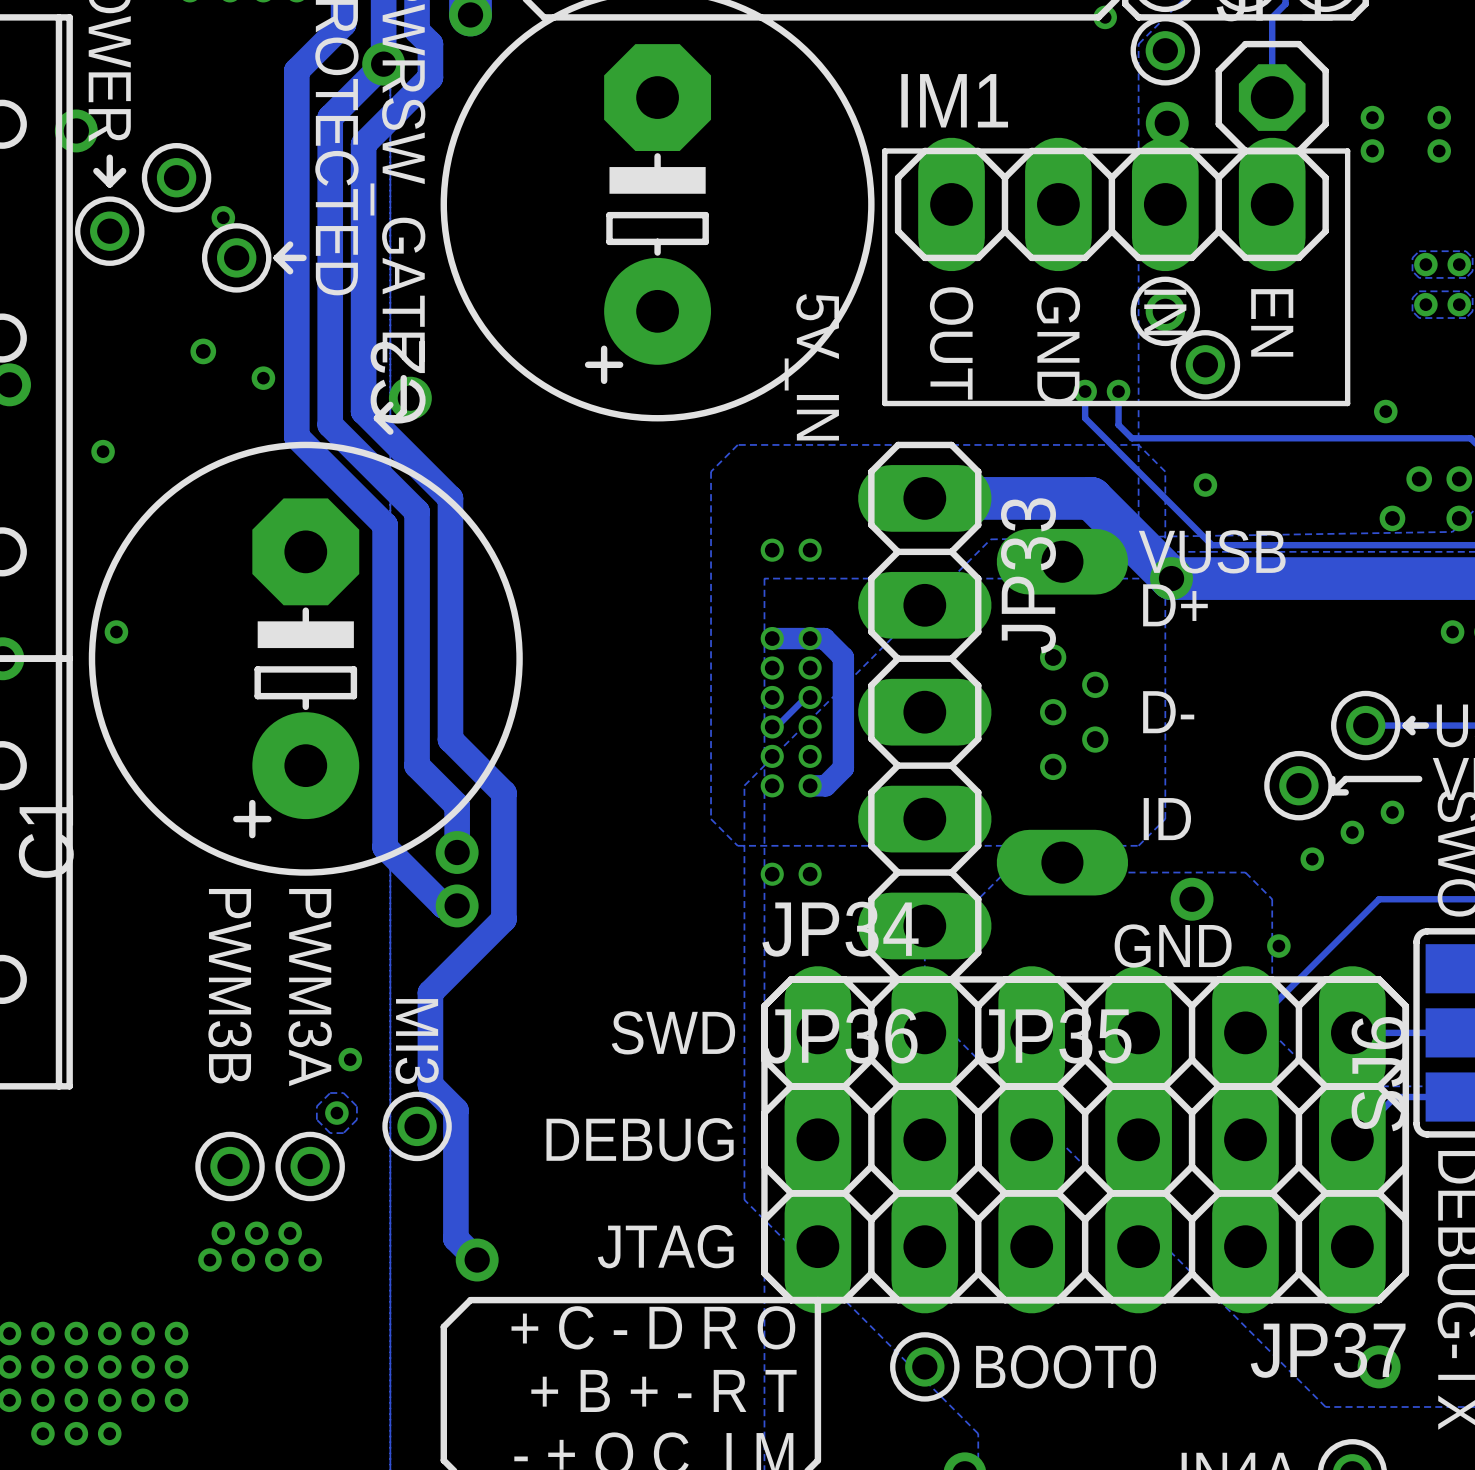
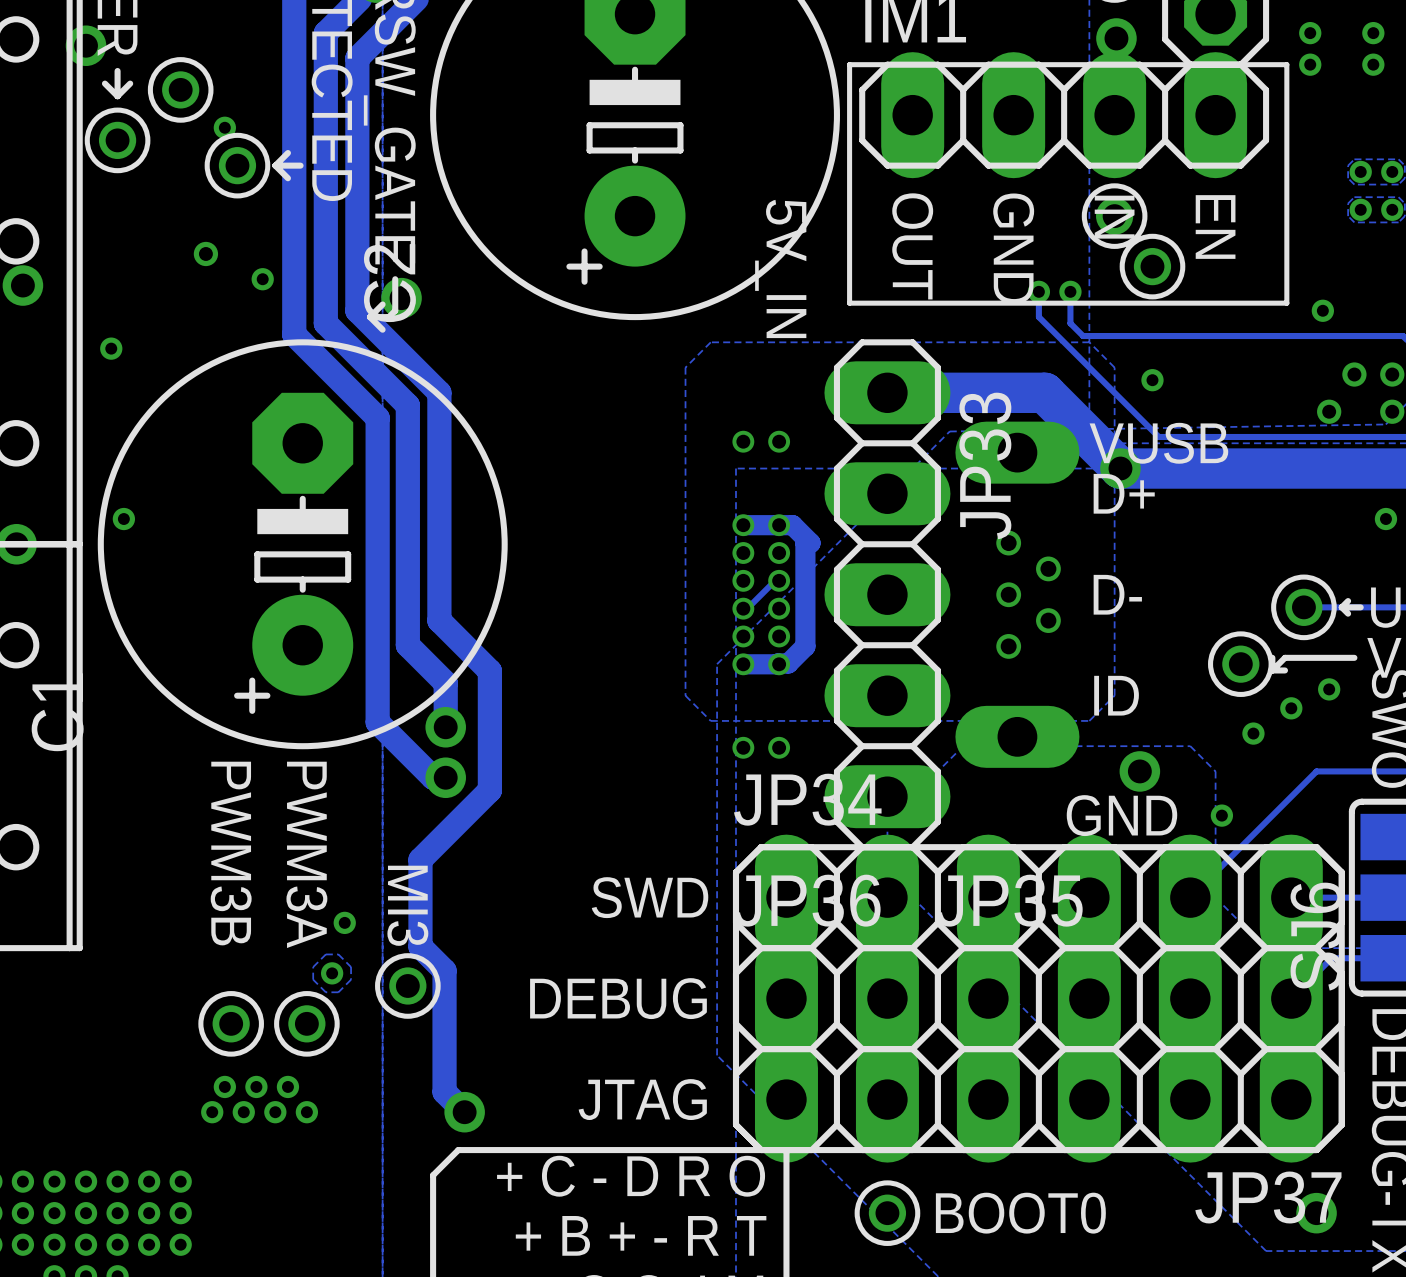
track: (843, 657) (843, 768) (825, 785) (810, 785) -> (810, 543) (805, 543) (805, 646) (788, 663) (745, 664)

